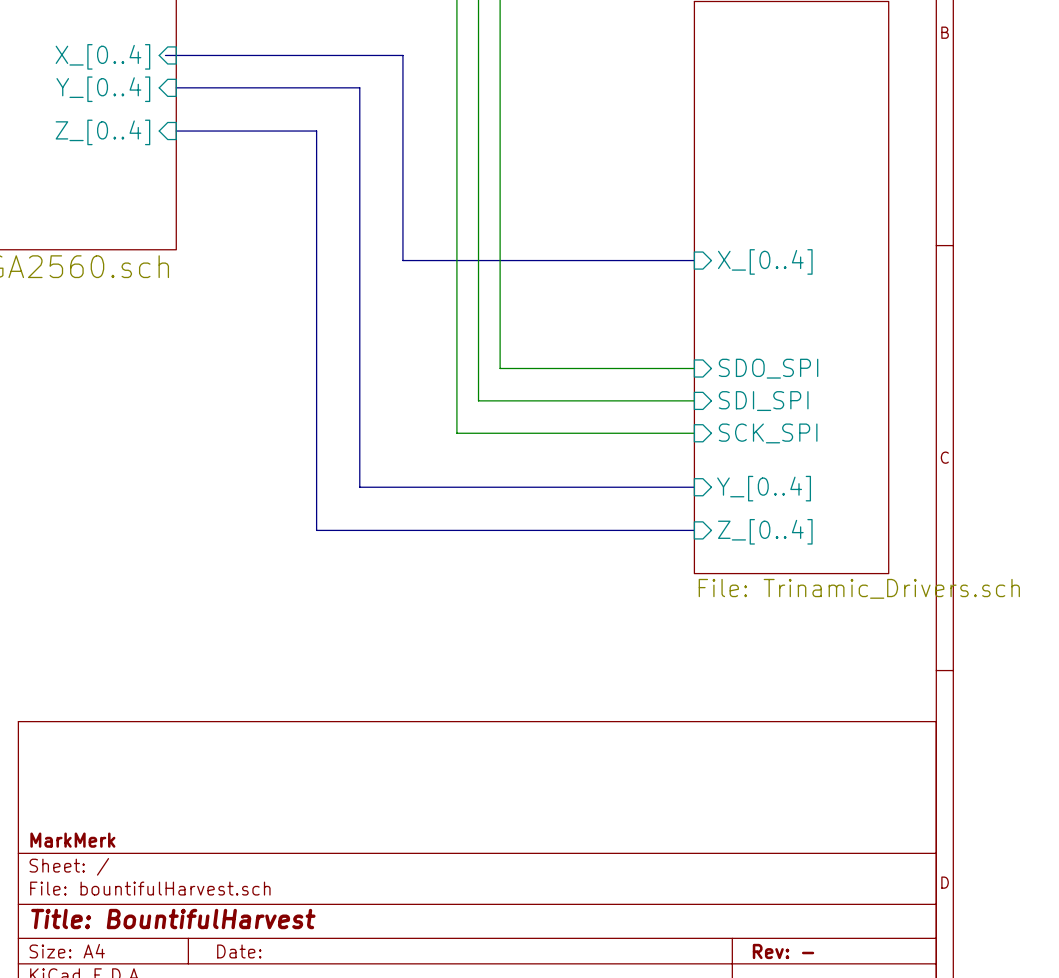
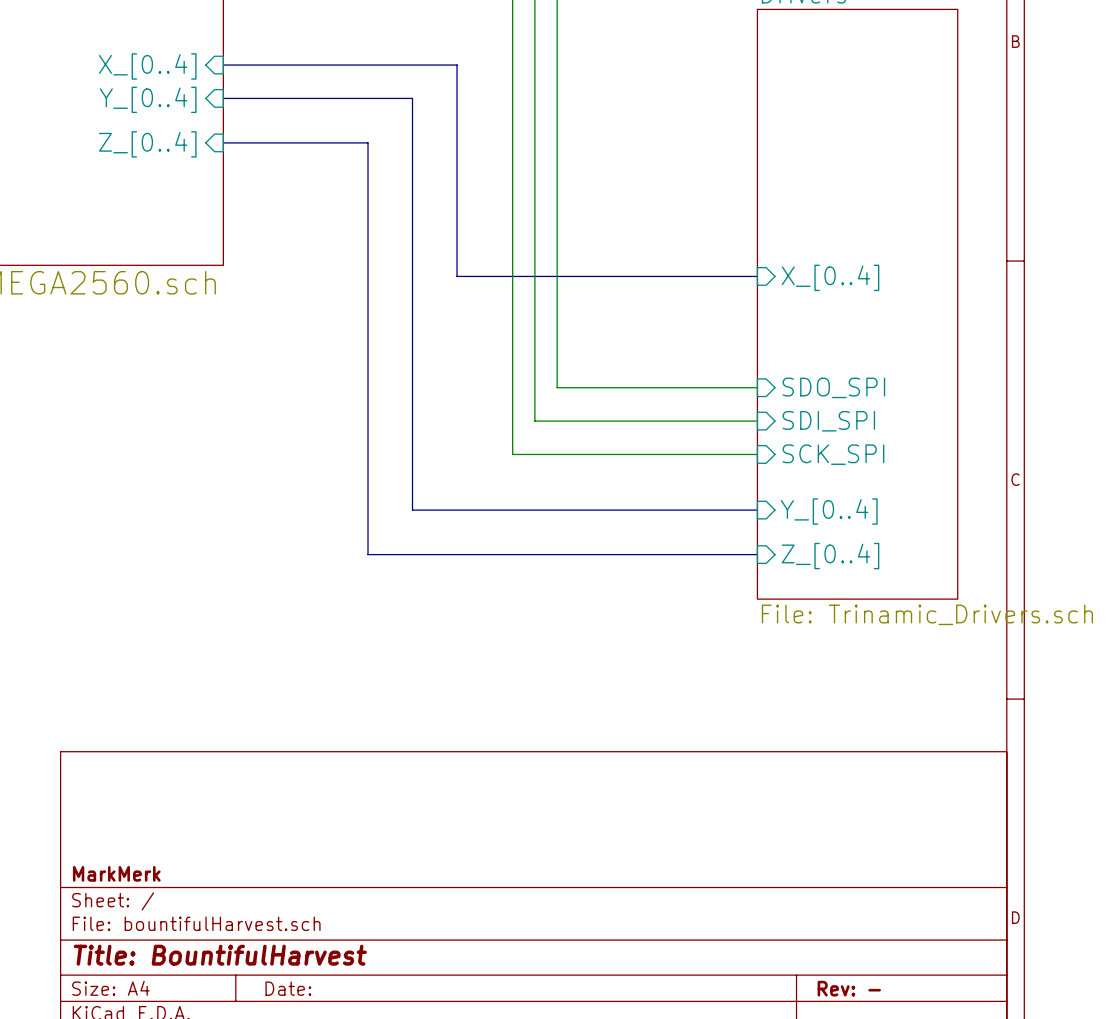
bus: (165, 55) (176, 55) -> none

